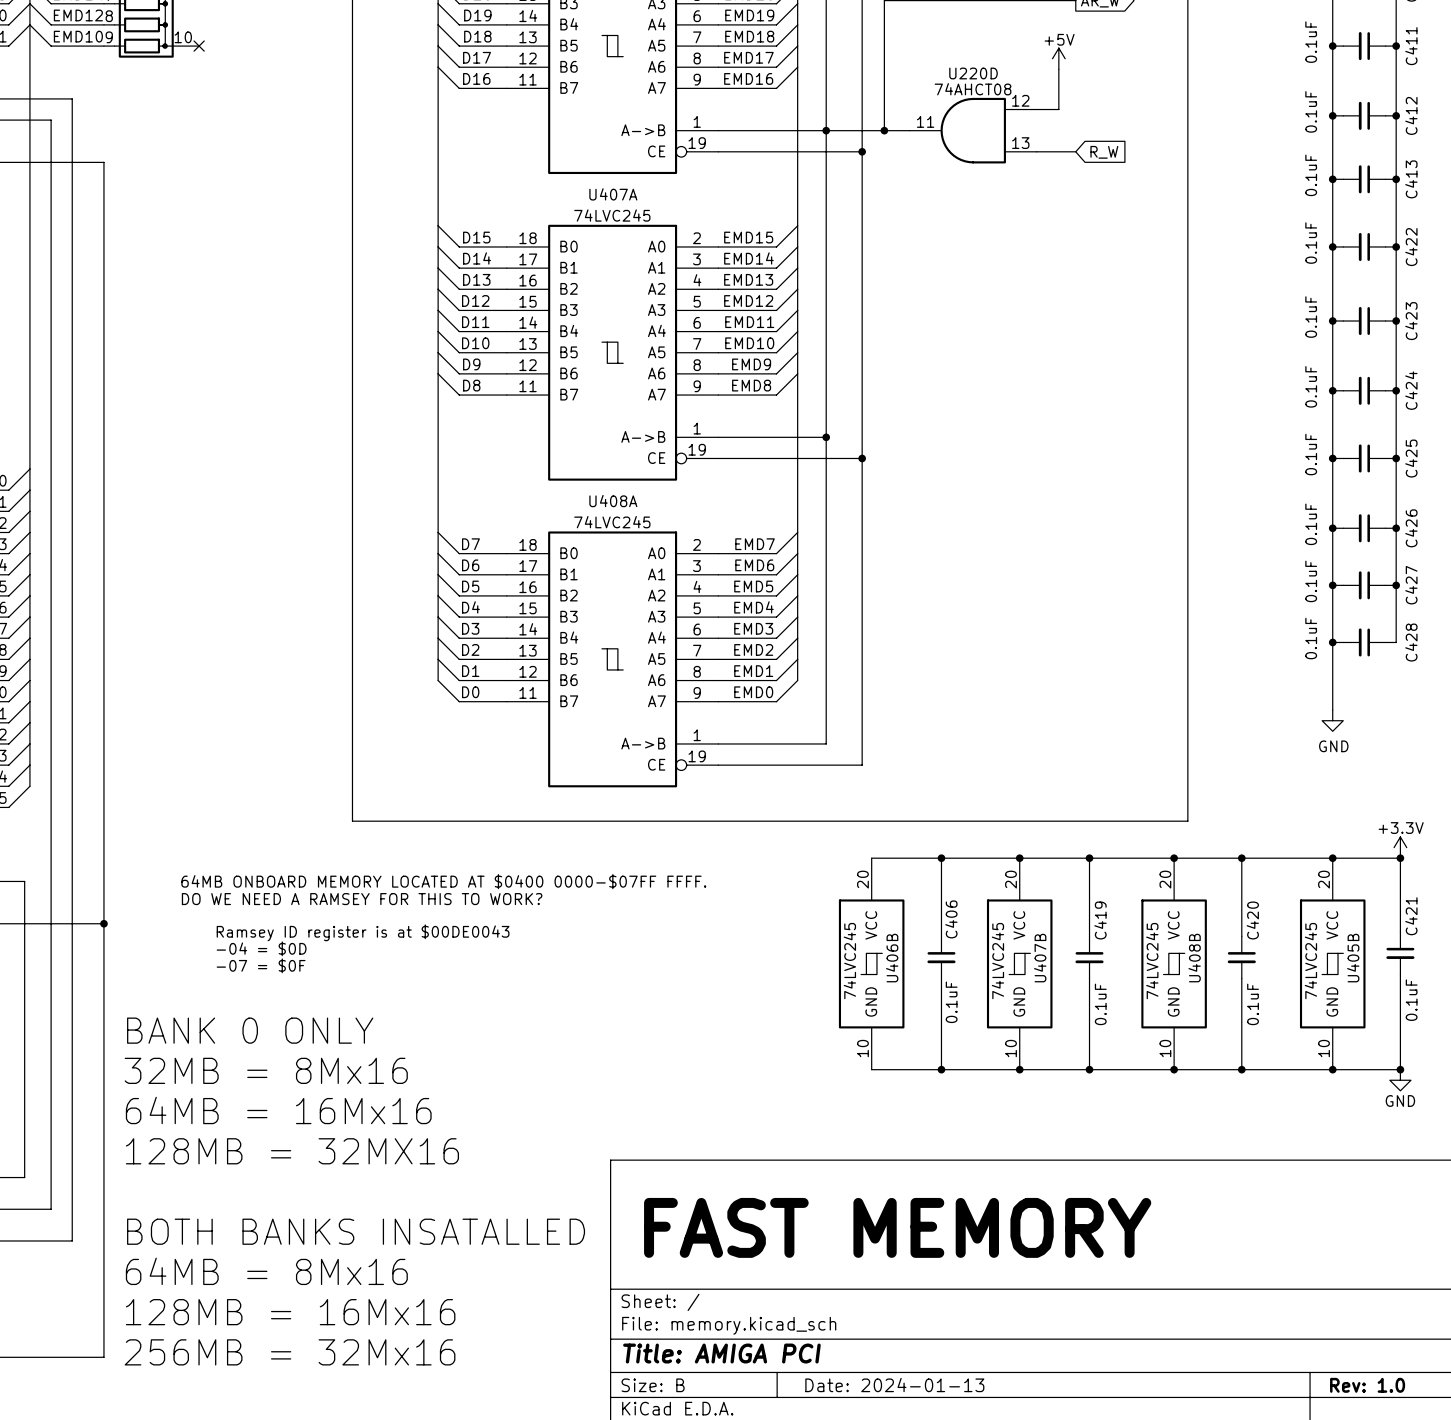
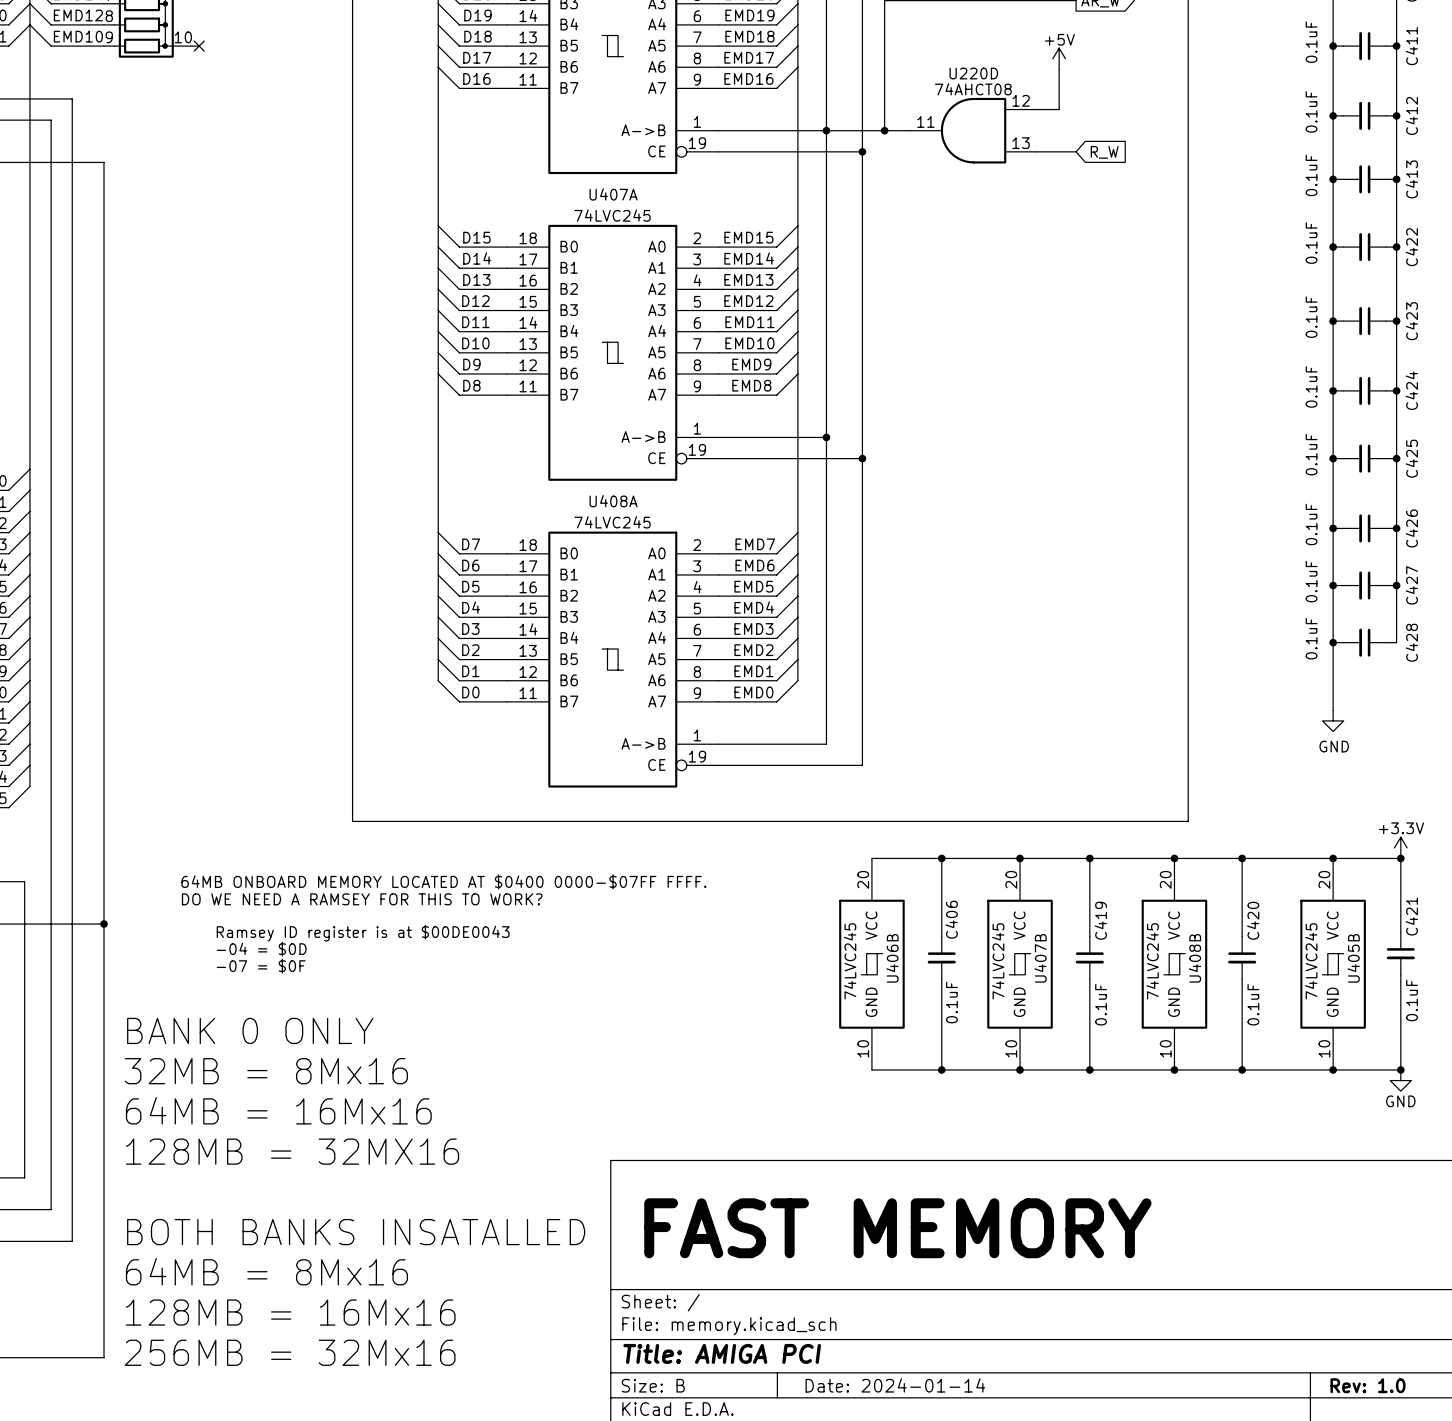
title block: Date: 2024-01-13 (894, 1385) -> Date: 2024-01-14 (895, 1385)

